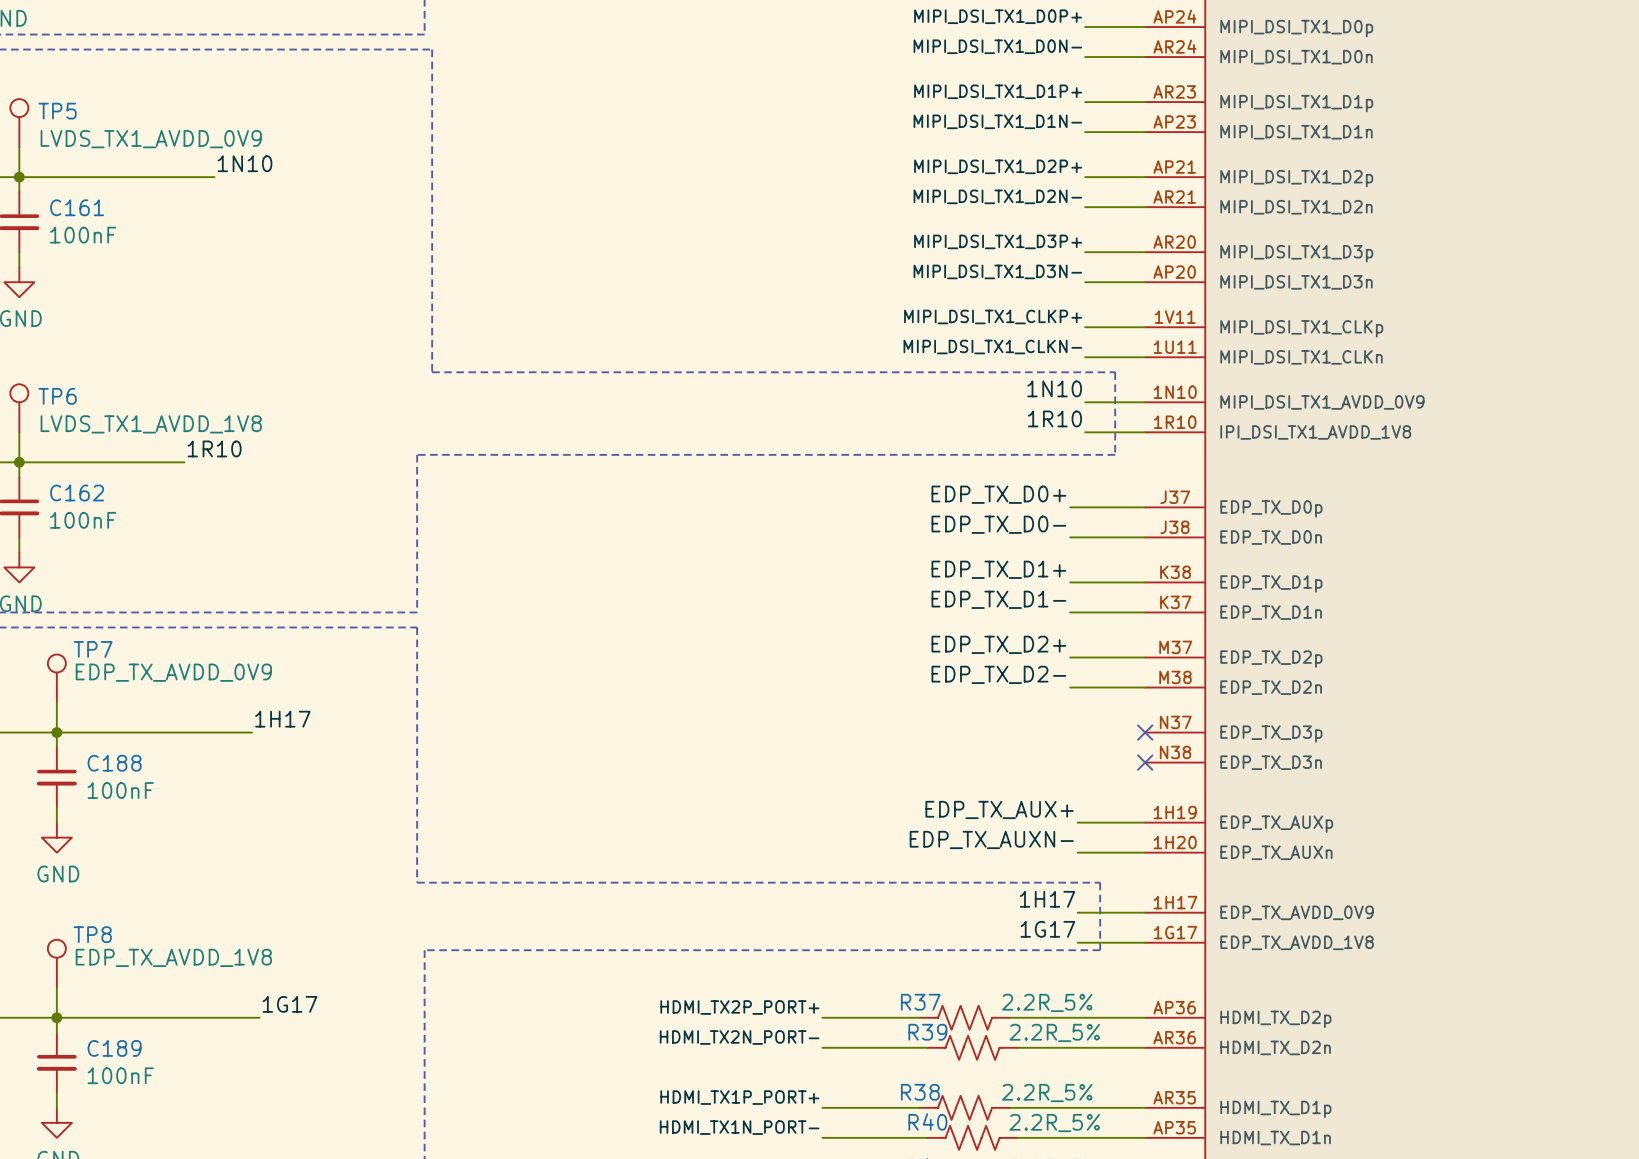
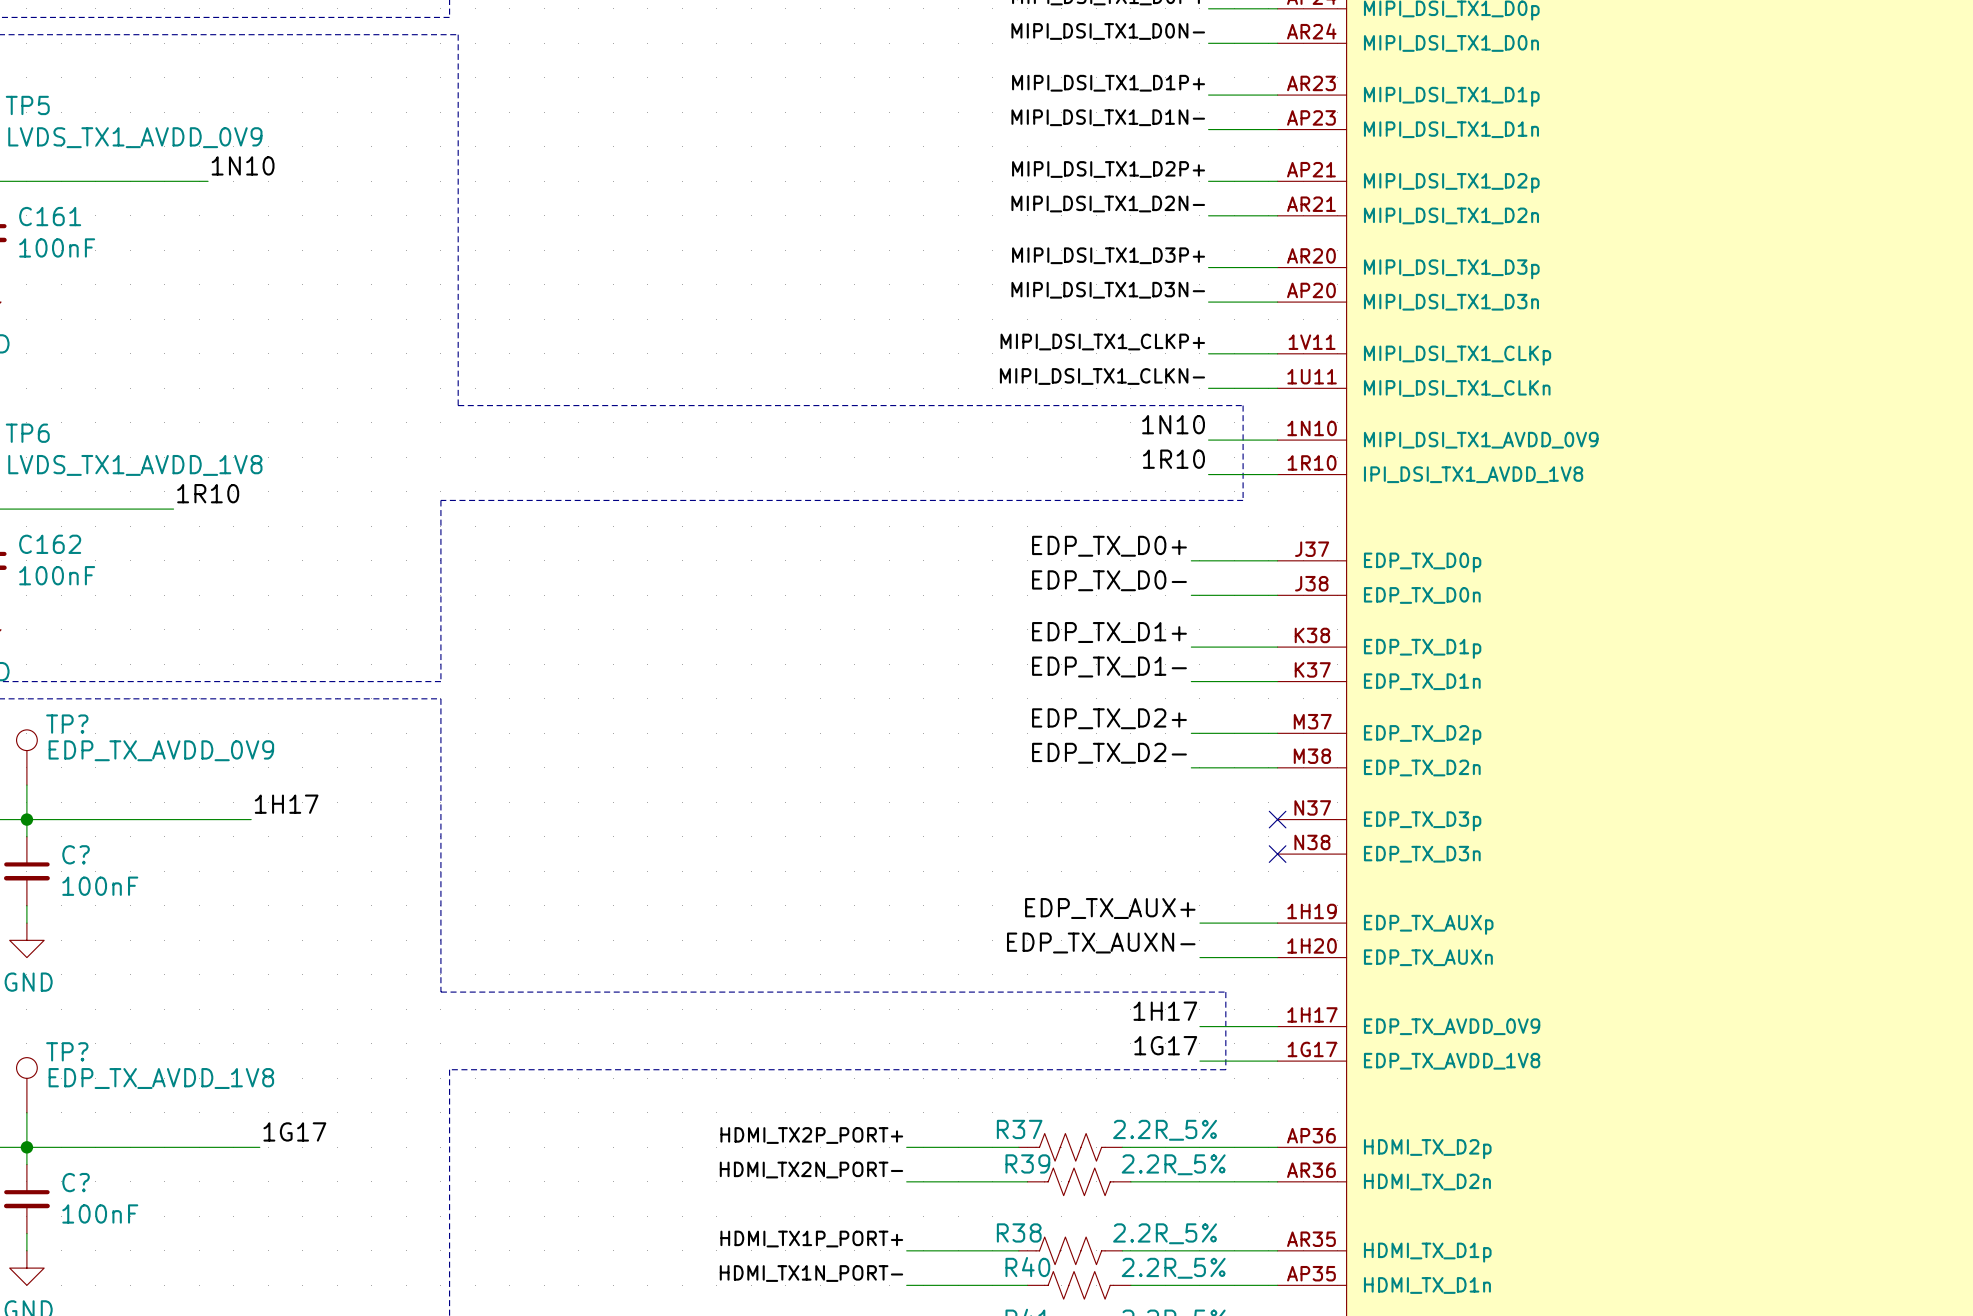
TP7 name: TP7 (93, 649) -> TP? (67, 724)
C188 name: C188 (114, 763) -> C? (76, 854)
TP8 name: TP8 (92, 934) -> TP? (67, 1051)
C189 name: C189 (114, 1048) -> C? (76, 1182)

